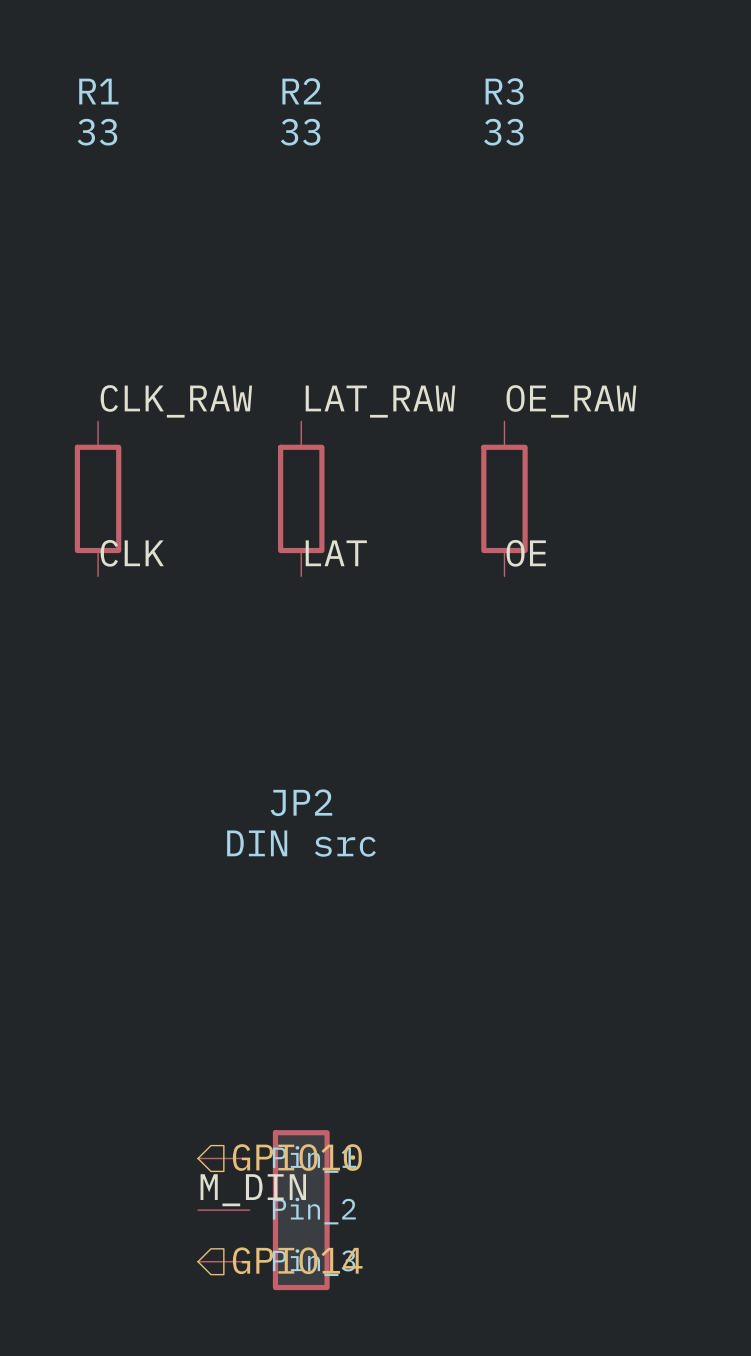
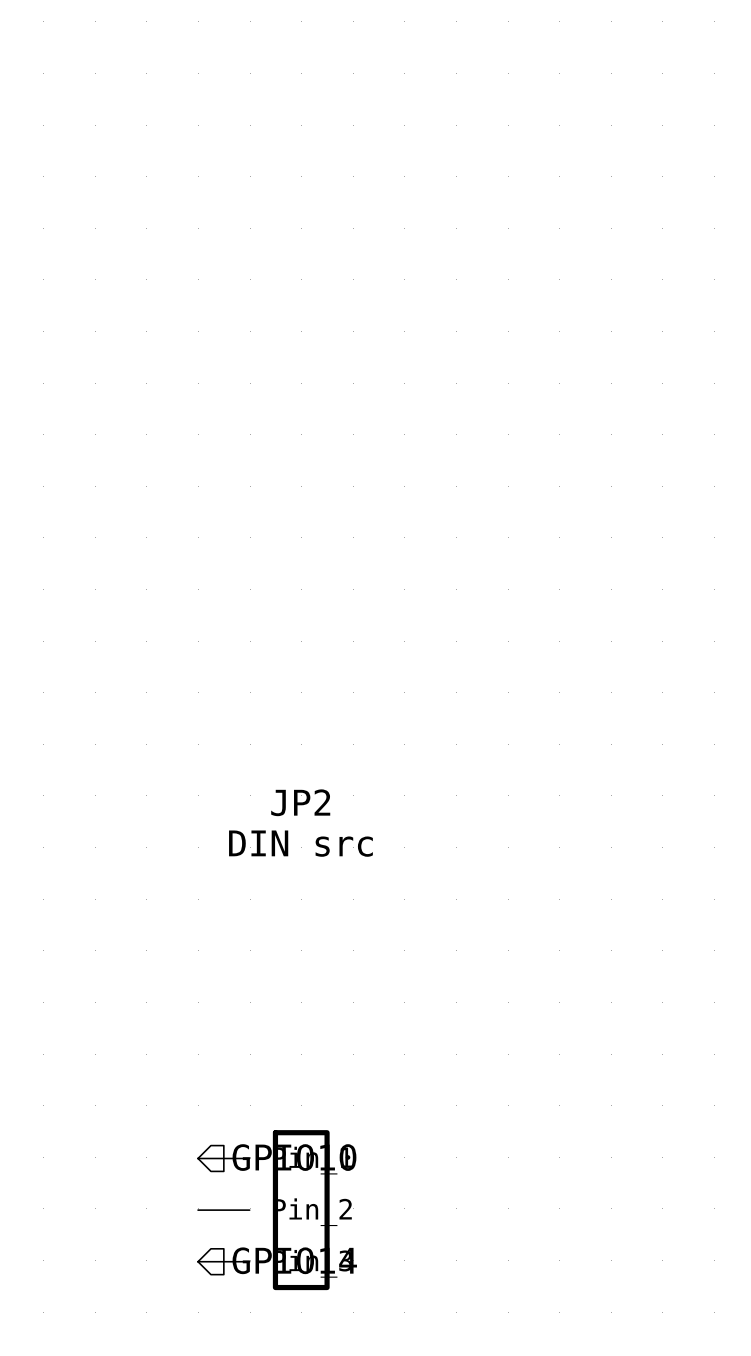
label: CLK_RAW (176, 401) -> none
label: LAT_RAW (380, 401) -> none
label: OE_RAW (571, 401) -> none
R1: 33 (98, 498) -> none
R2: 33 (301, 498) -> none
R3: 33 (504, 498) -> none
label: CLK (132, 553) -> none
label: LAT (336, 553) -> none
label: OE (526, 553) -> none
label: M_DIN (253, 1190) -> none

